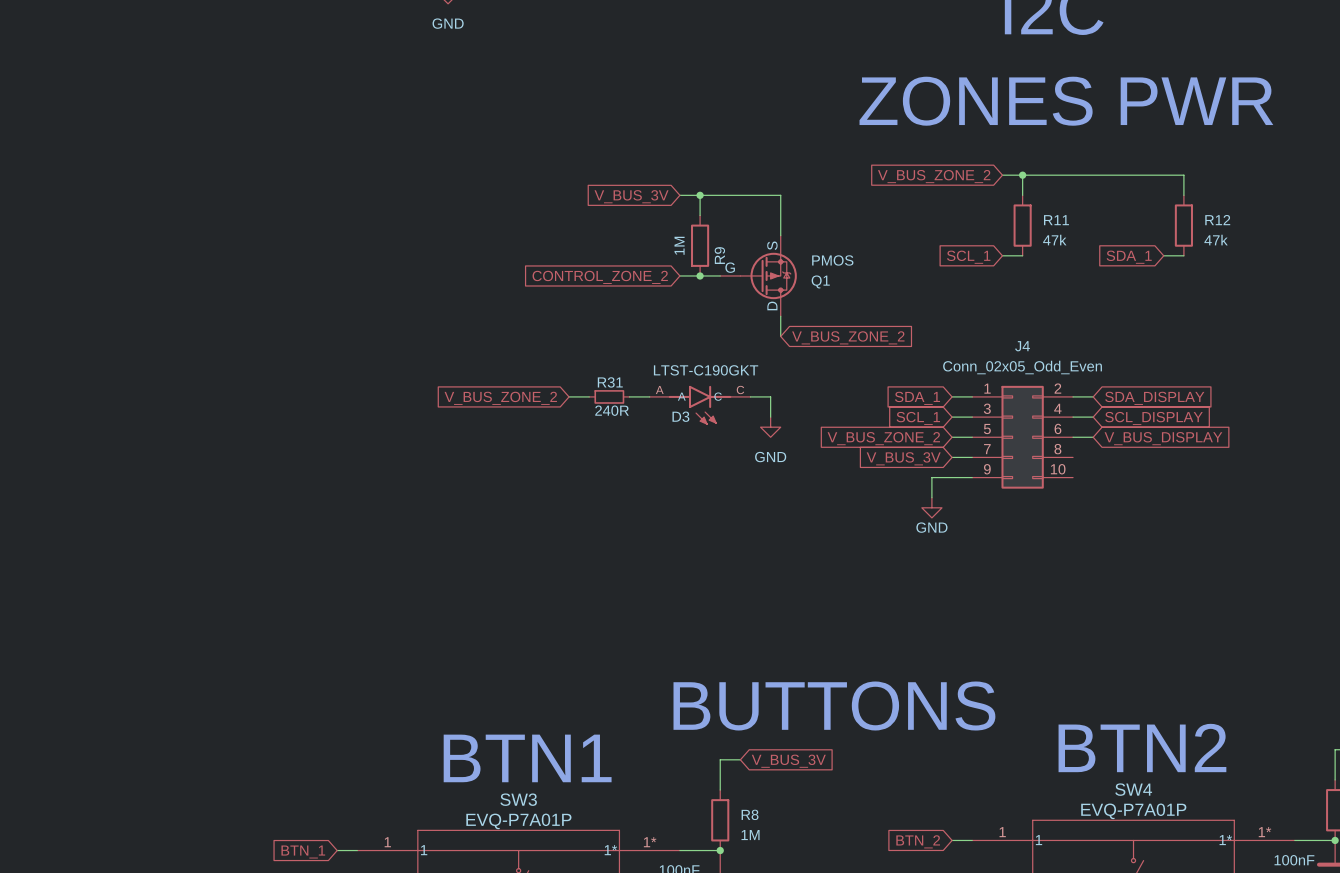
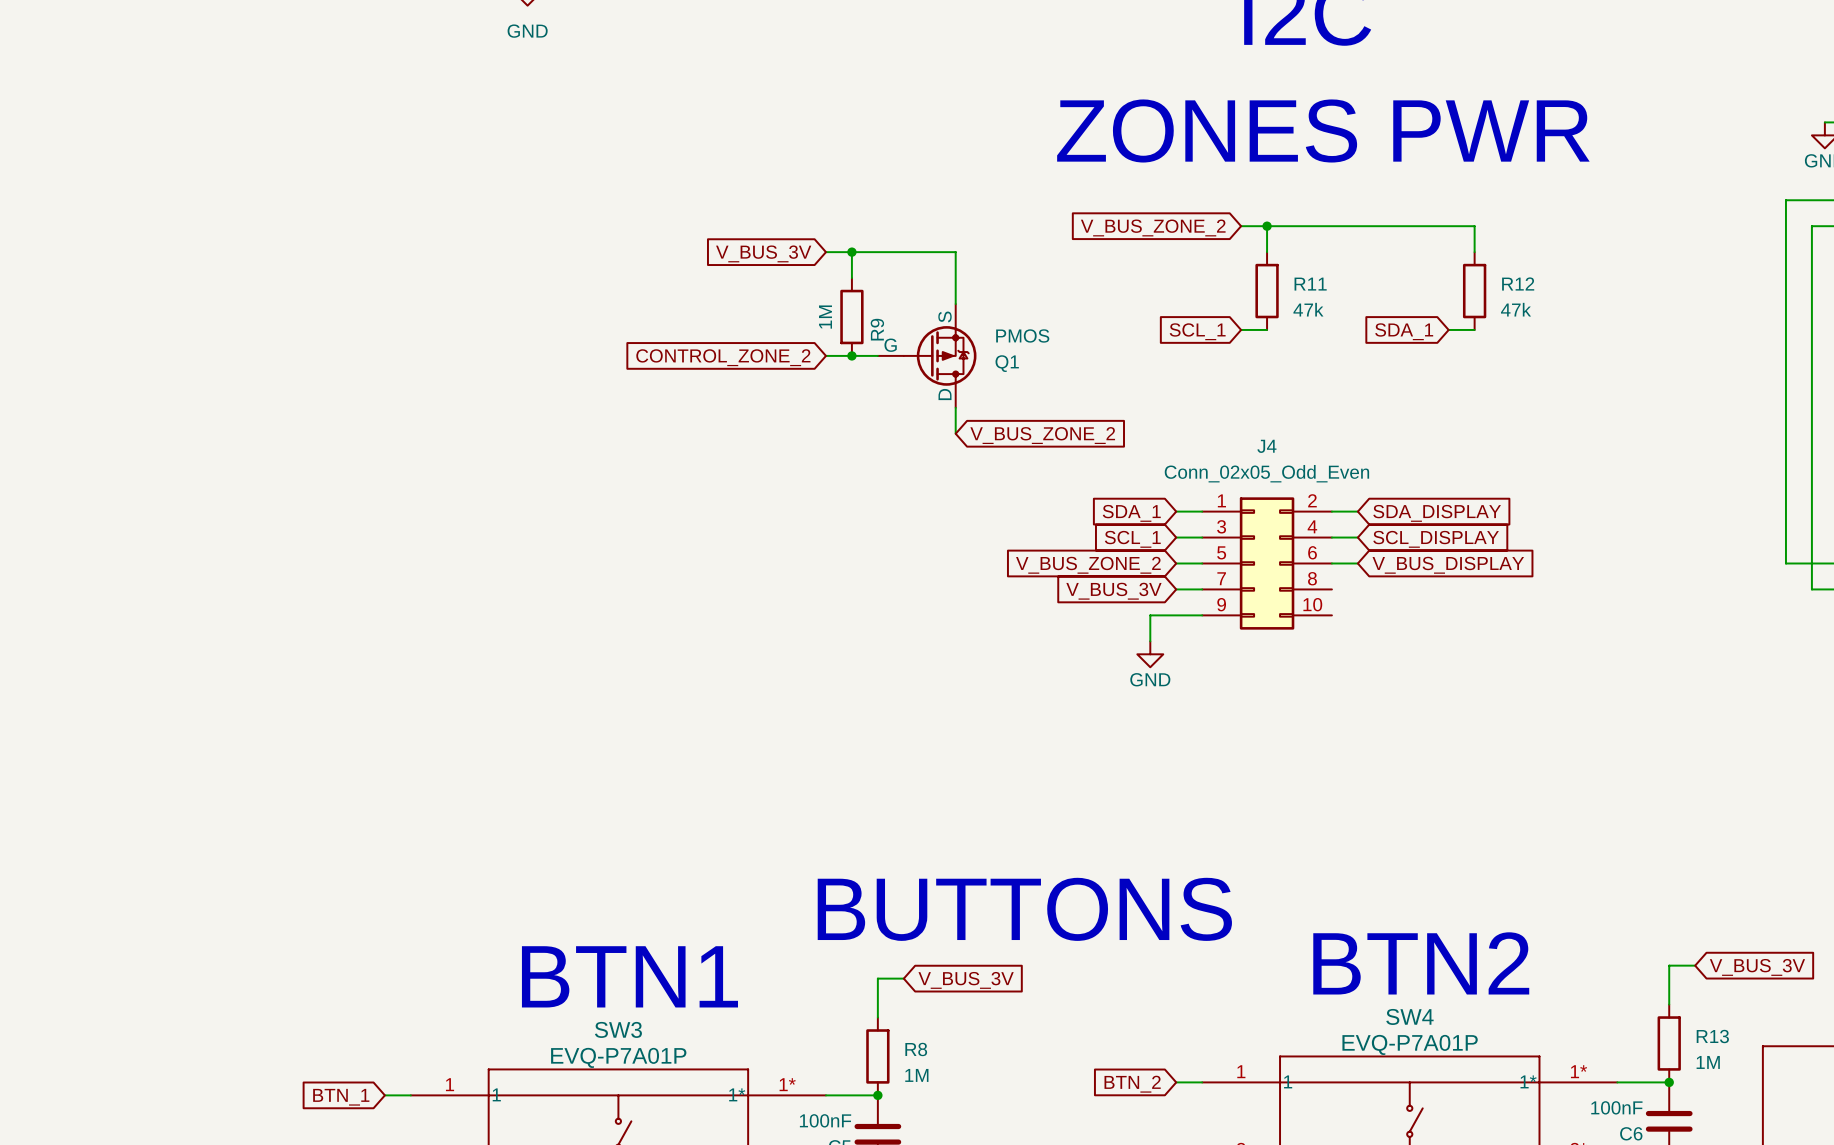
wire: (569, 396) (589, 396) -> none
R31: 240R (609, 396) -> none
wire: (629, 396) (649, 396) -> none
wire: (750, 396) (770, 396) (770, 417) -> none
global label: V_BUS_ZONE_2 (500, 398) -> none
D3: LTST-C190GKT (700, 405) -> none
power symbol: GND (770, 427) -> none

